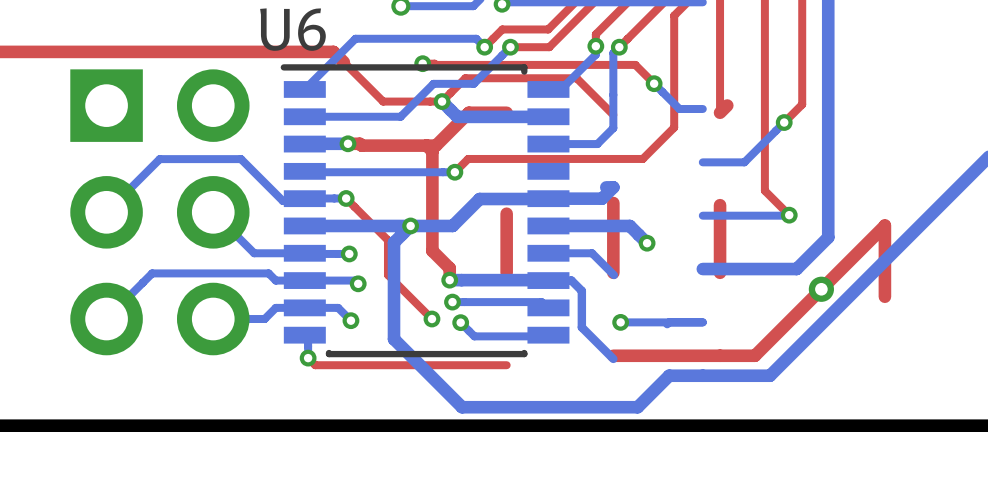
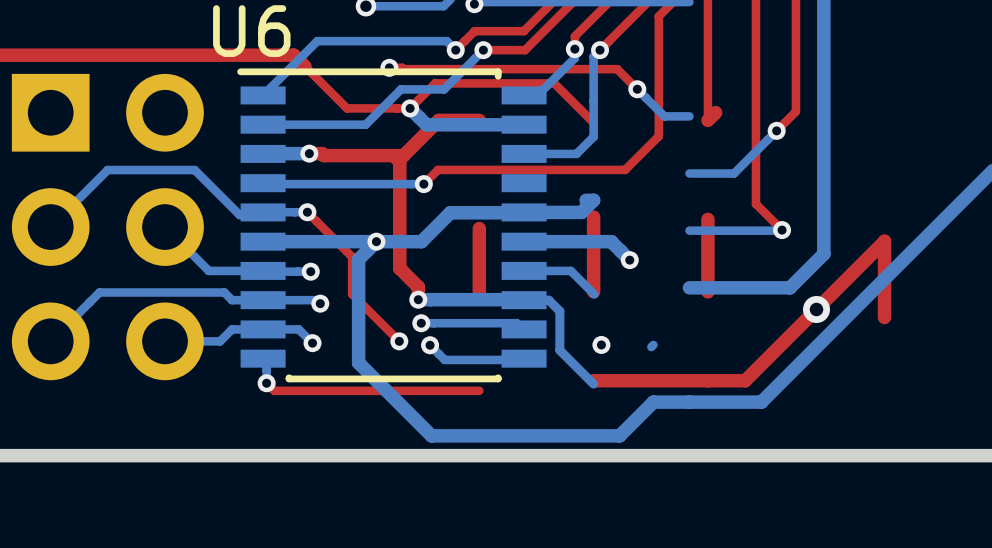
bottom track: (702, 322) (620, 322) -> none

